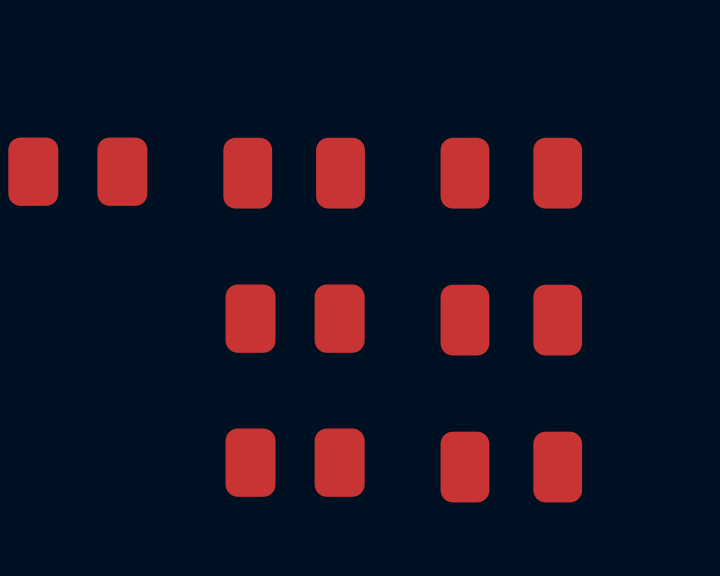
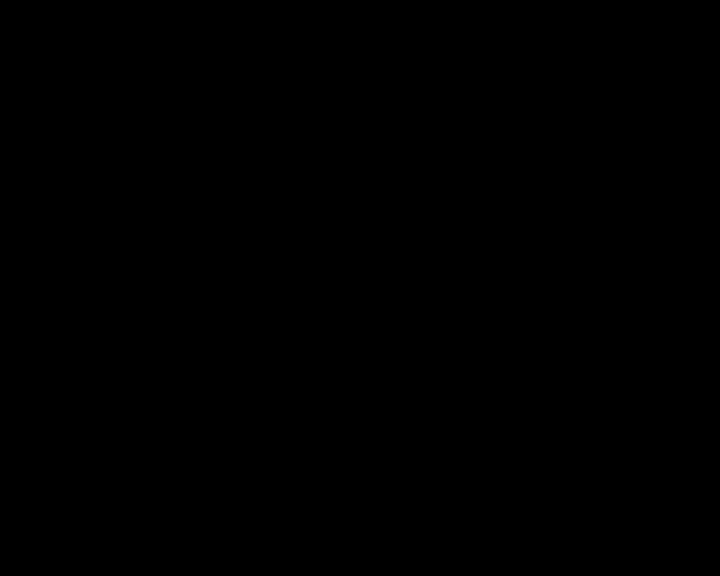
part: (77, 171) -> none
part: (294, 173) -> none
part: (511, 173) -> none
part: (295, 318) -> none
part: (511, 320) -> none
part: (295, 462) -> none
part: (511, 467) -> none

